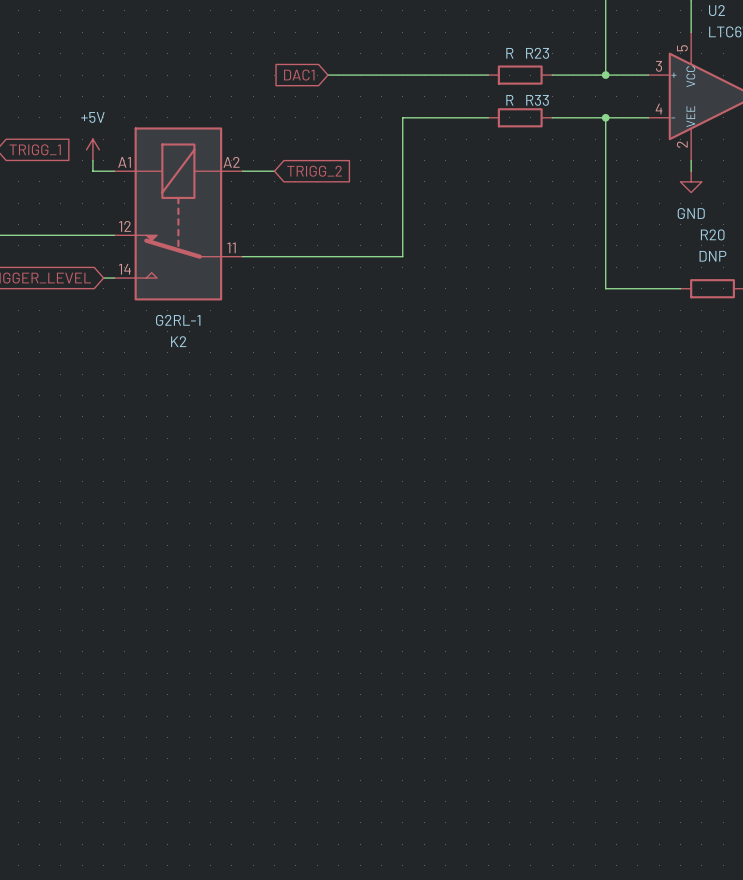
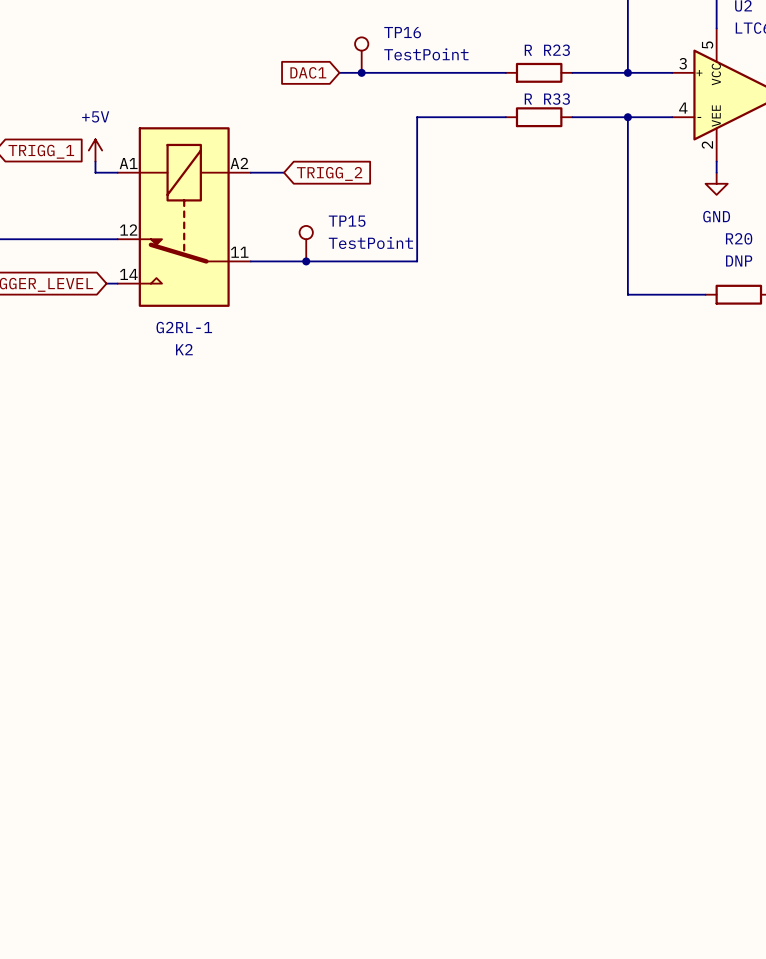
TP16: none -> TestPoint (361, 55)
junction: none -> (361, 72)
TP15: none -> TestPoint (306, 243)
junction: none -> (306, 261)

